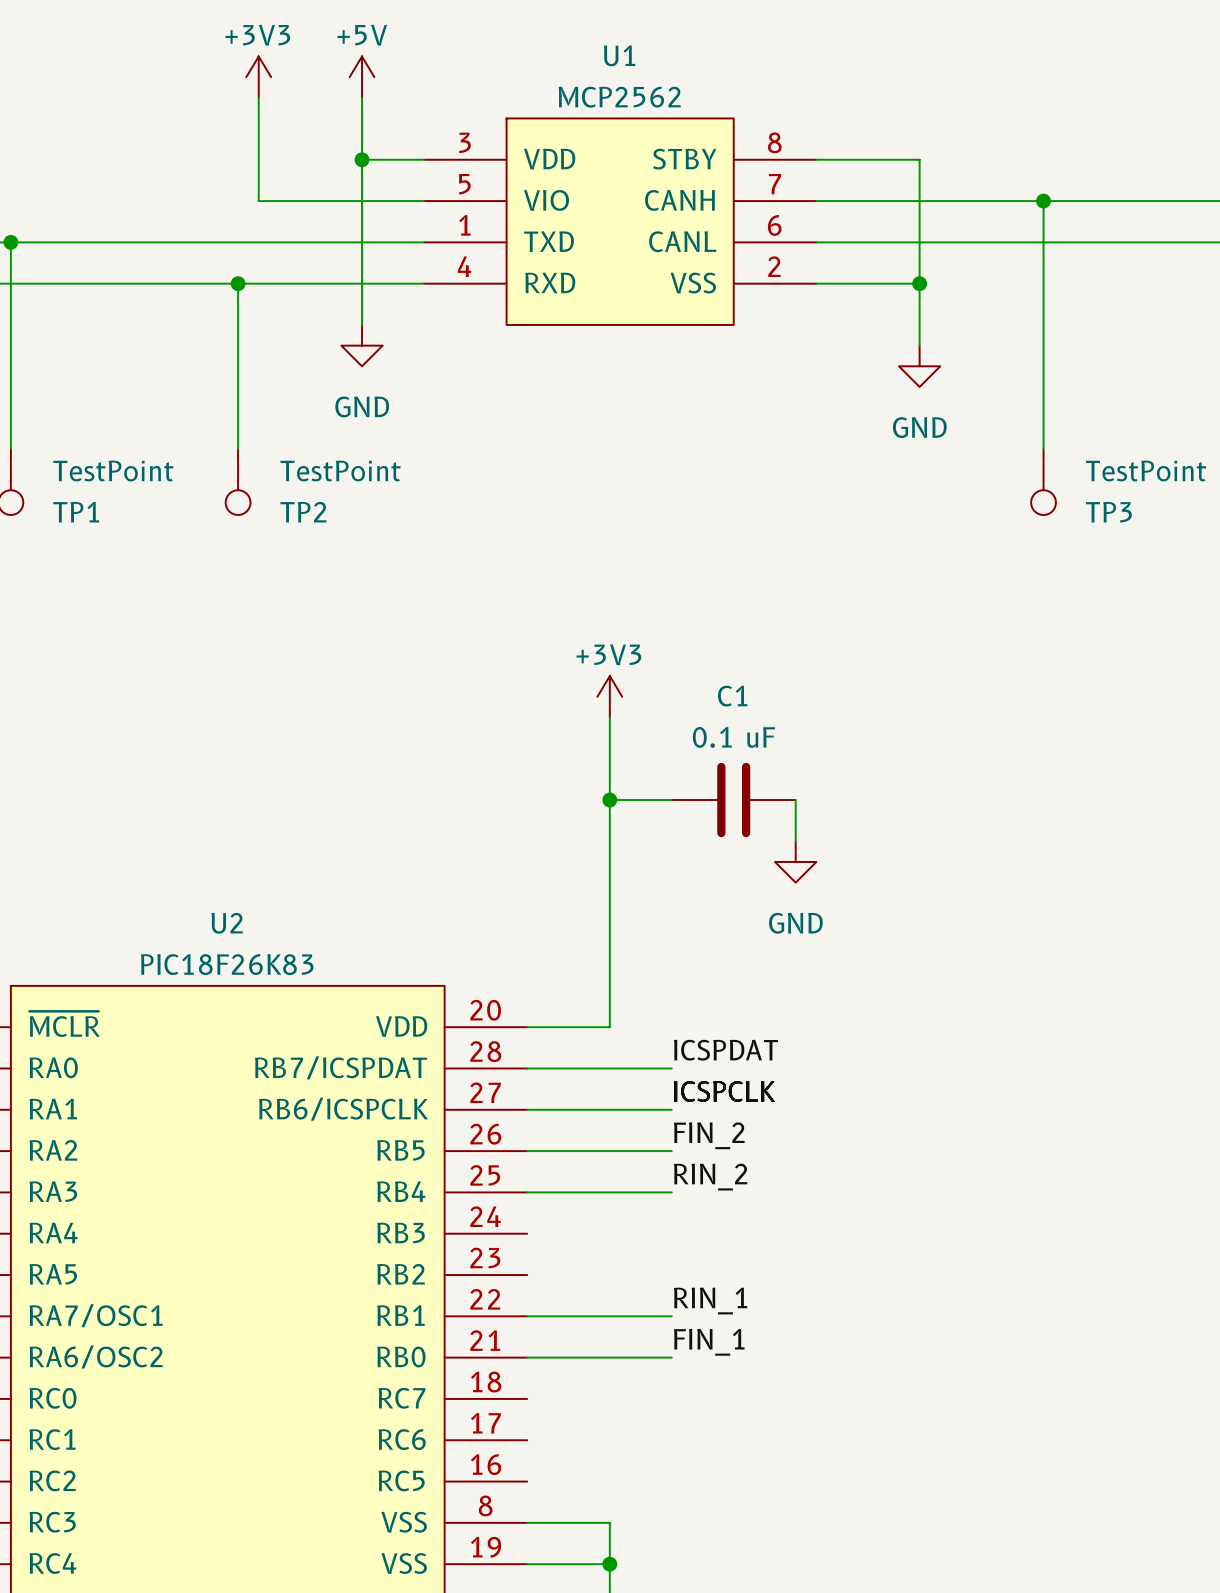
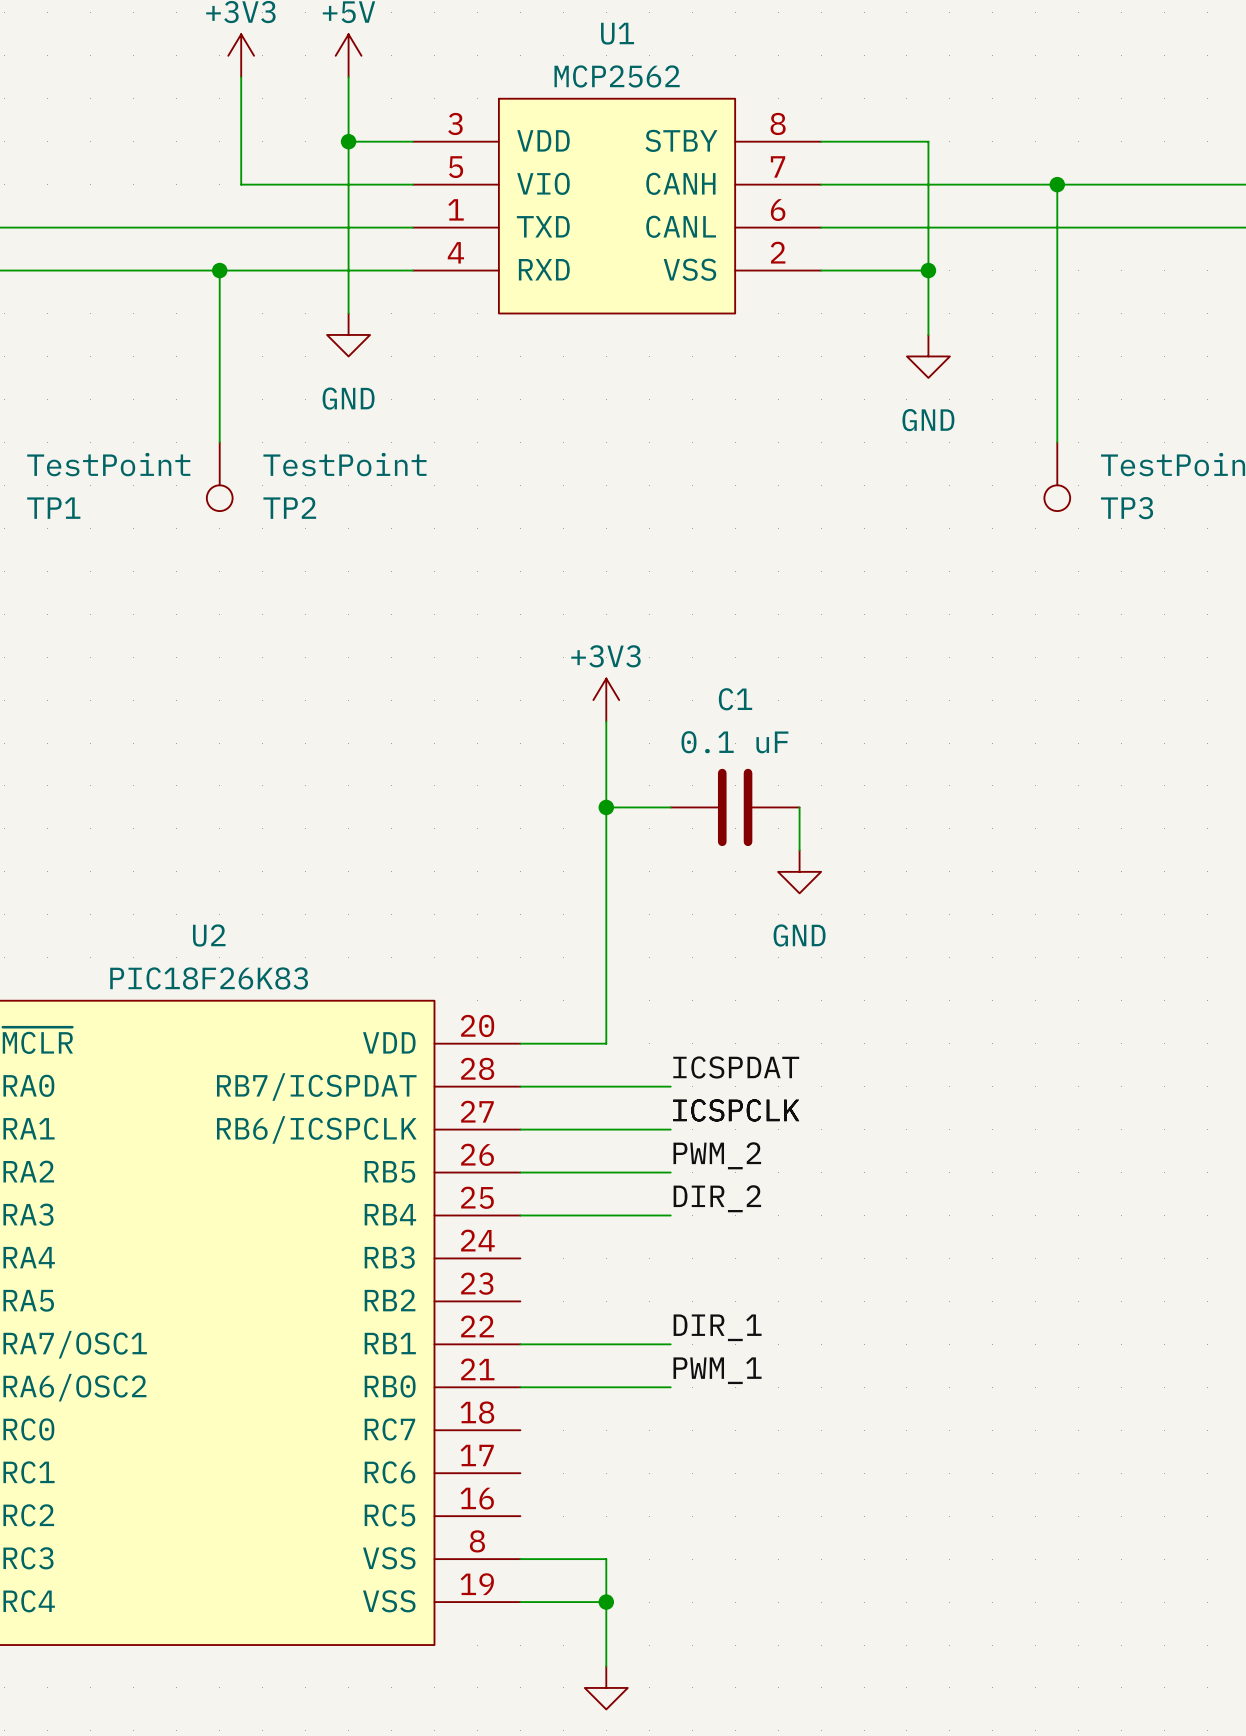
label: FIN_2 (709, 1135) -> PWM_2 (717, 1155)
label: RIN_2 (710, 1177) -> DIR_2 (717, 1198)
label: RIN_1 (710, 1300) -> DIR_1 (717, 1327)
label: FIN_1 (709, 1342) -> PWM_1 (717, 1370)

